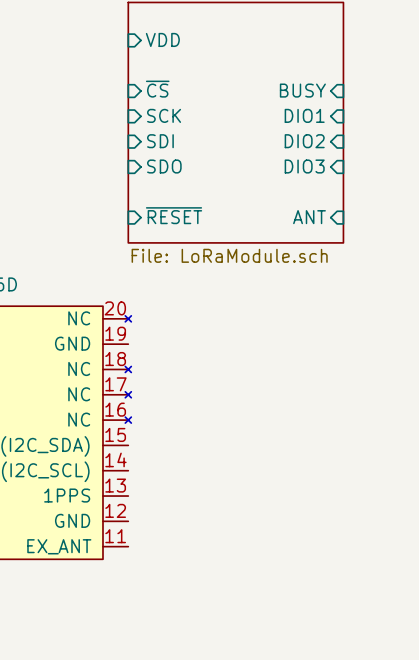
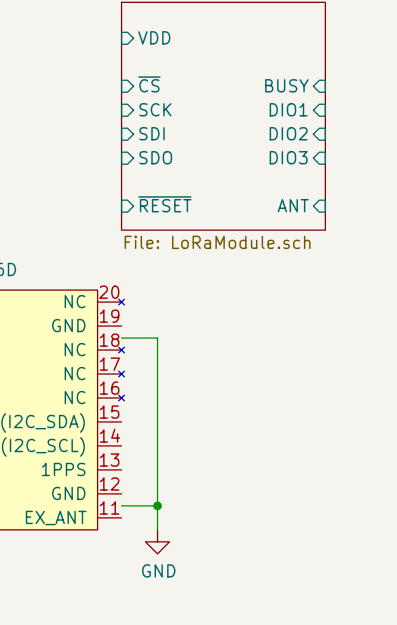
wire: none -> (121, 338) (157, 338) (157, 529)
wire: none -> (121, 505) (157, 505)
junction: none -> (157, 505)
power symbol: none -> GND (157, 541)

